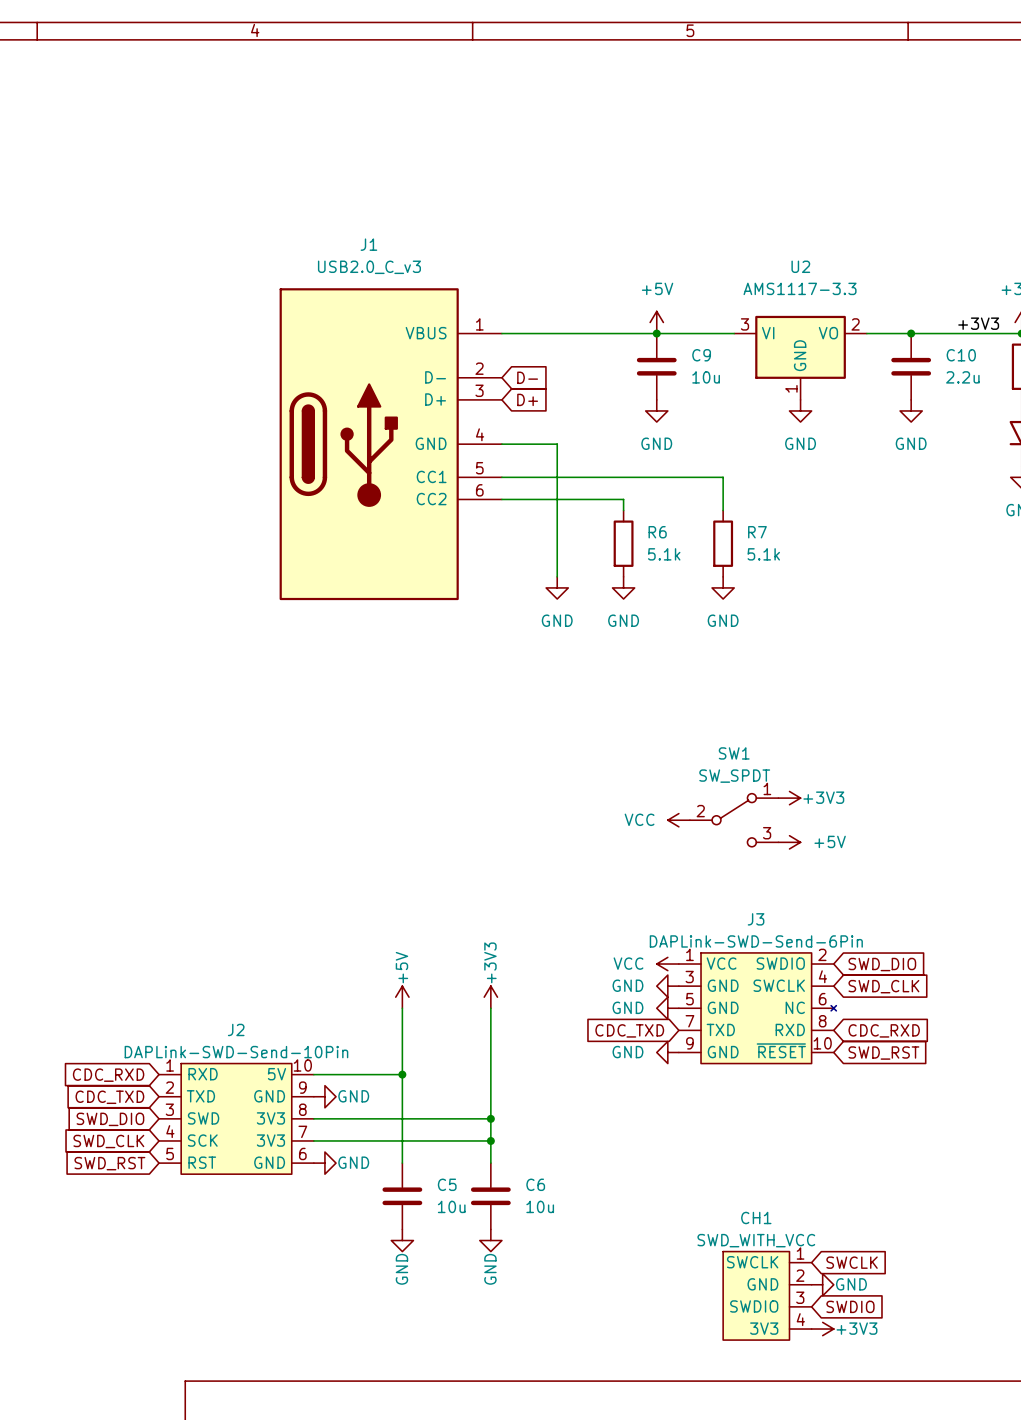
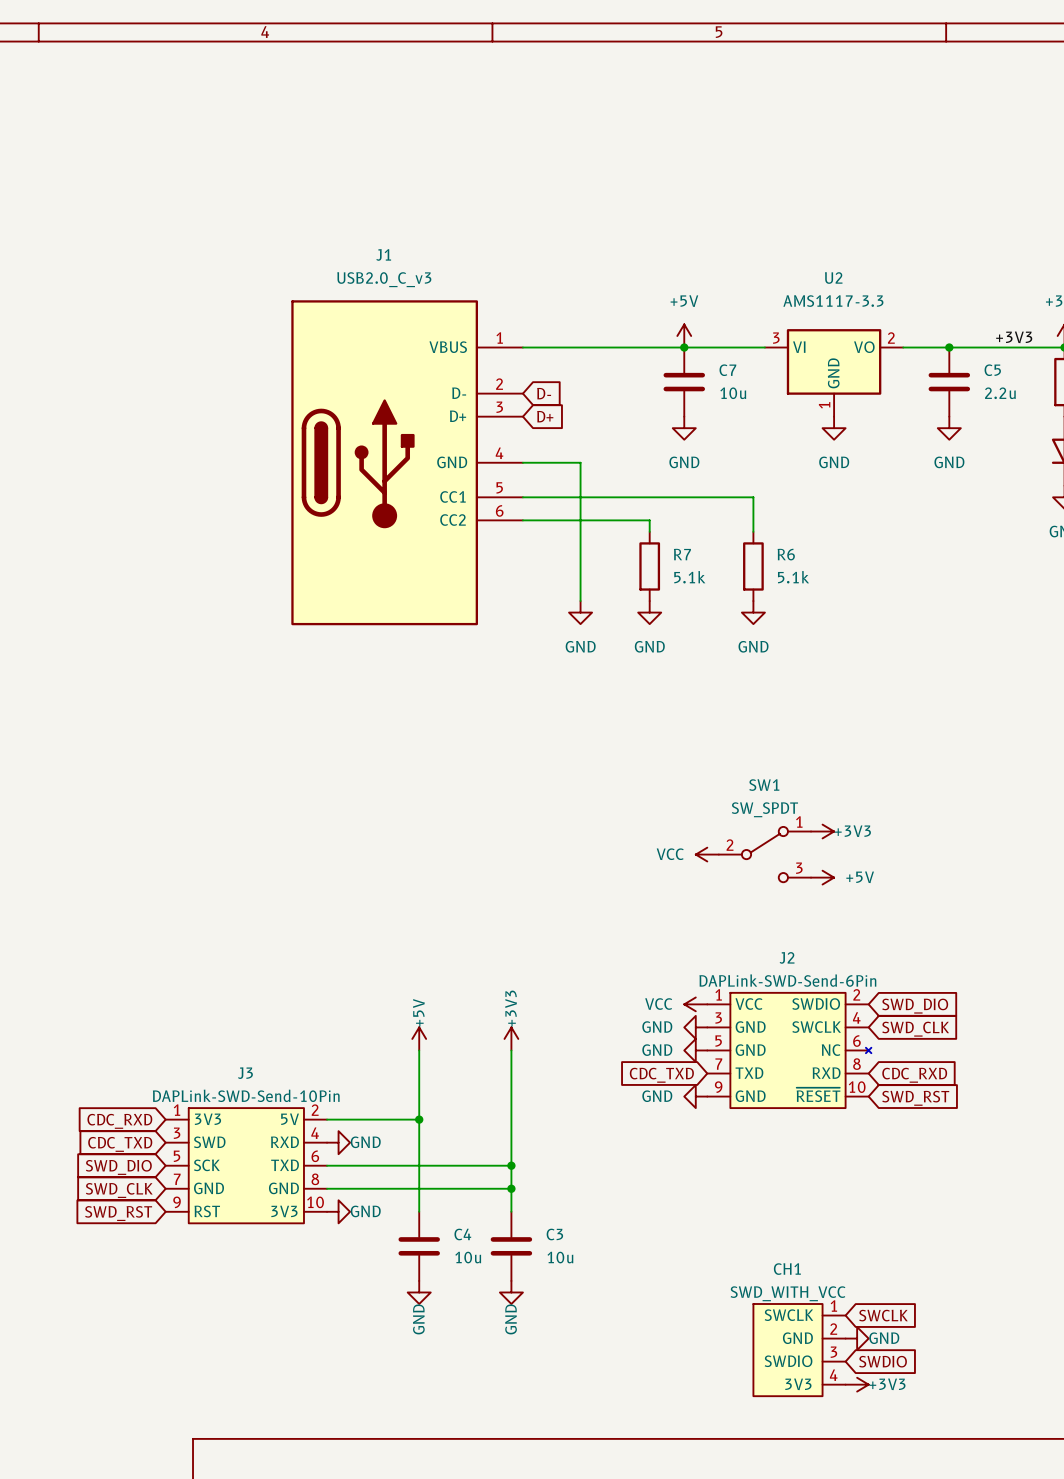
C9 name: C9 (701, 355) -> C7 (727, 370)
C10 name: C10 (961, 355) -> C5 (992, 370)
R6 name: R6 (657, 532) -> R7 (682, 554)
R7 name: R7 (757, 532) -> R6 (786, 554)
J3 name: J3 (756, 919) -> J2 (787, 957)
J2 name: J2 (236, 1029) -> J3 (245, 1073)
J2 symbol: [159, 1063, 314, 1175] -> [165, 1108, 328, 1224]
C5 name: C5 (447, 1184) -> C4 (462, 1234)
C6 name: C6 (535, 1184) -> C3 (554, 1234)

